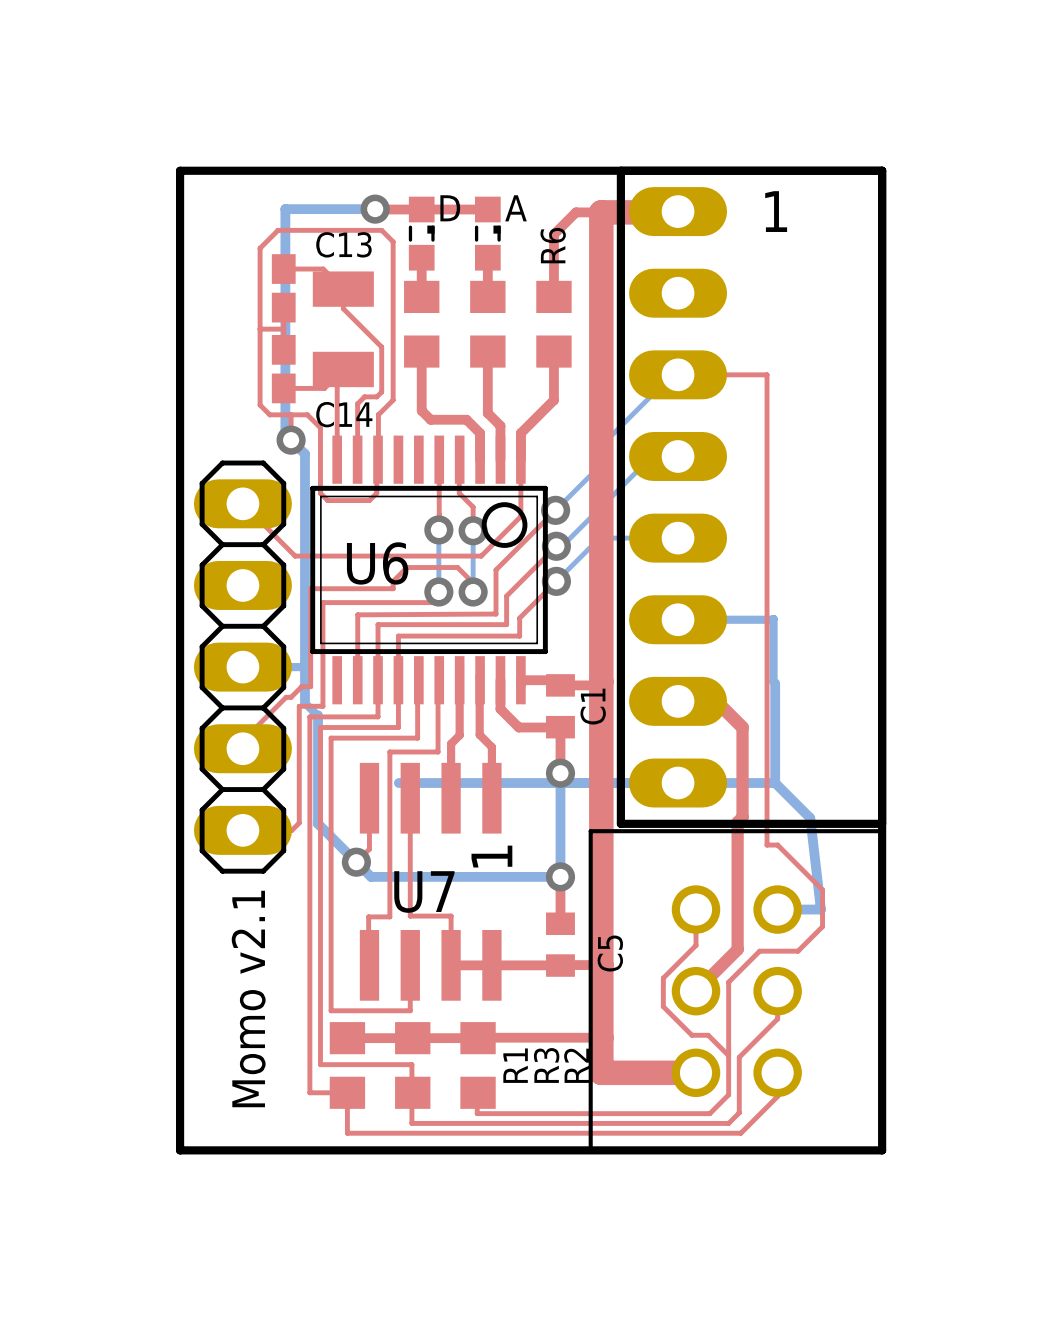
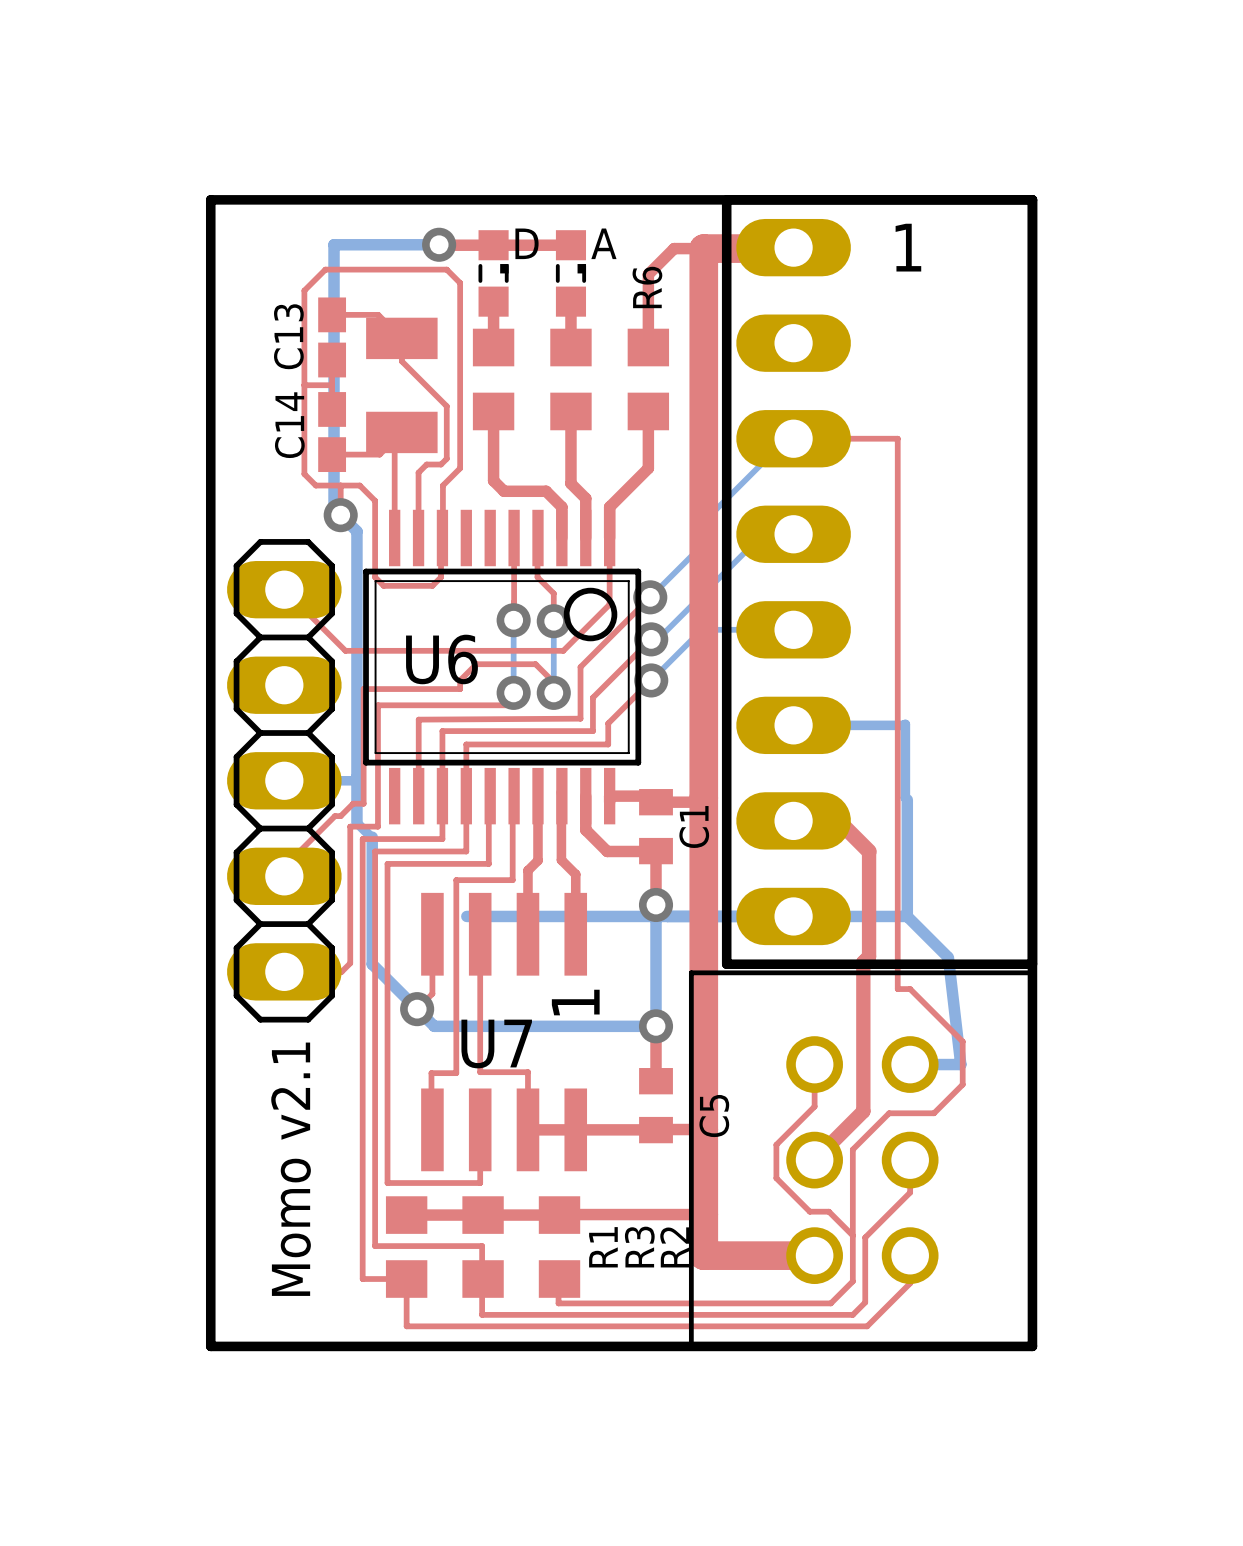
C13 name rotation: 0° (343, 244) -> 90° counterclockwise (288, 336)
C13 name position: C13 (343, 244) -> C13 (288, 336)
C14 name rotation: 0° (344, 414) -> 90° counterclockwise (289, 425)
C14 name position: C14 (344, 414) -> C14 (289, 425)

